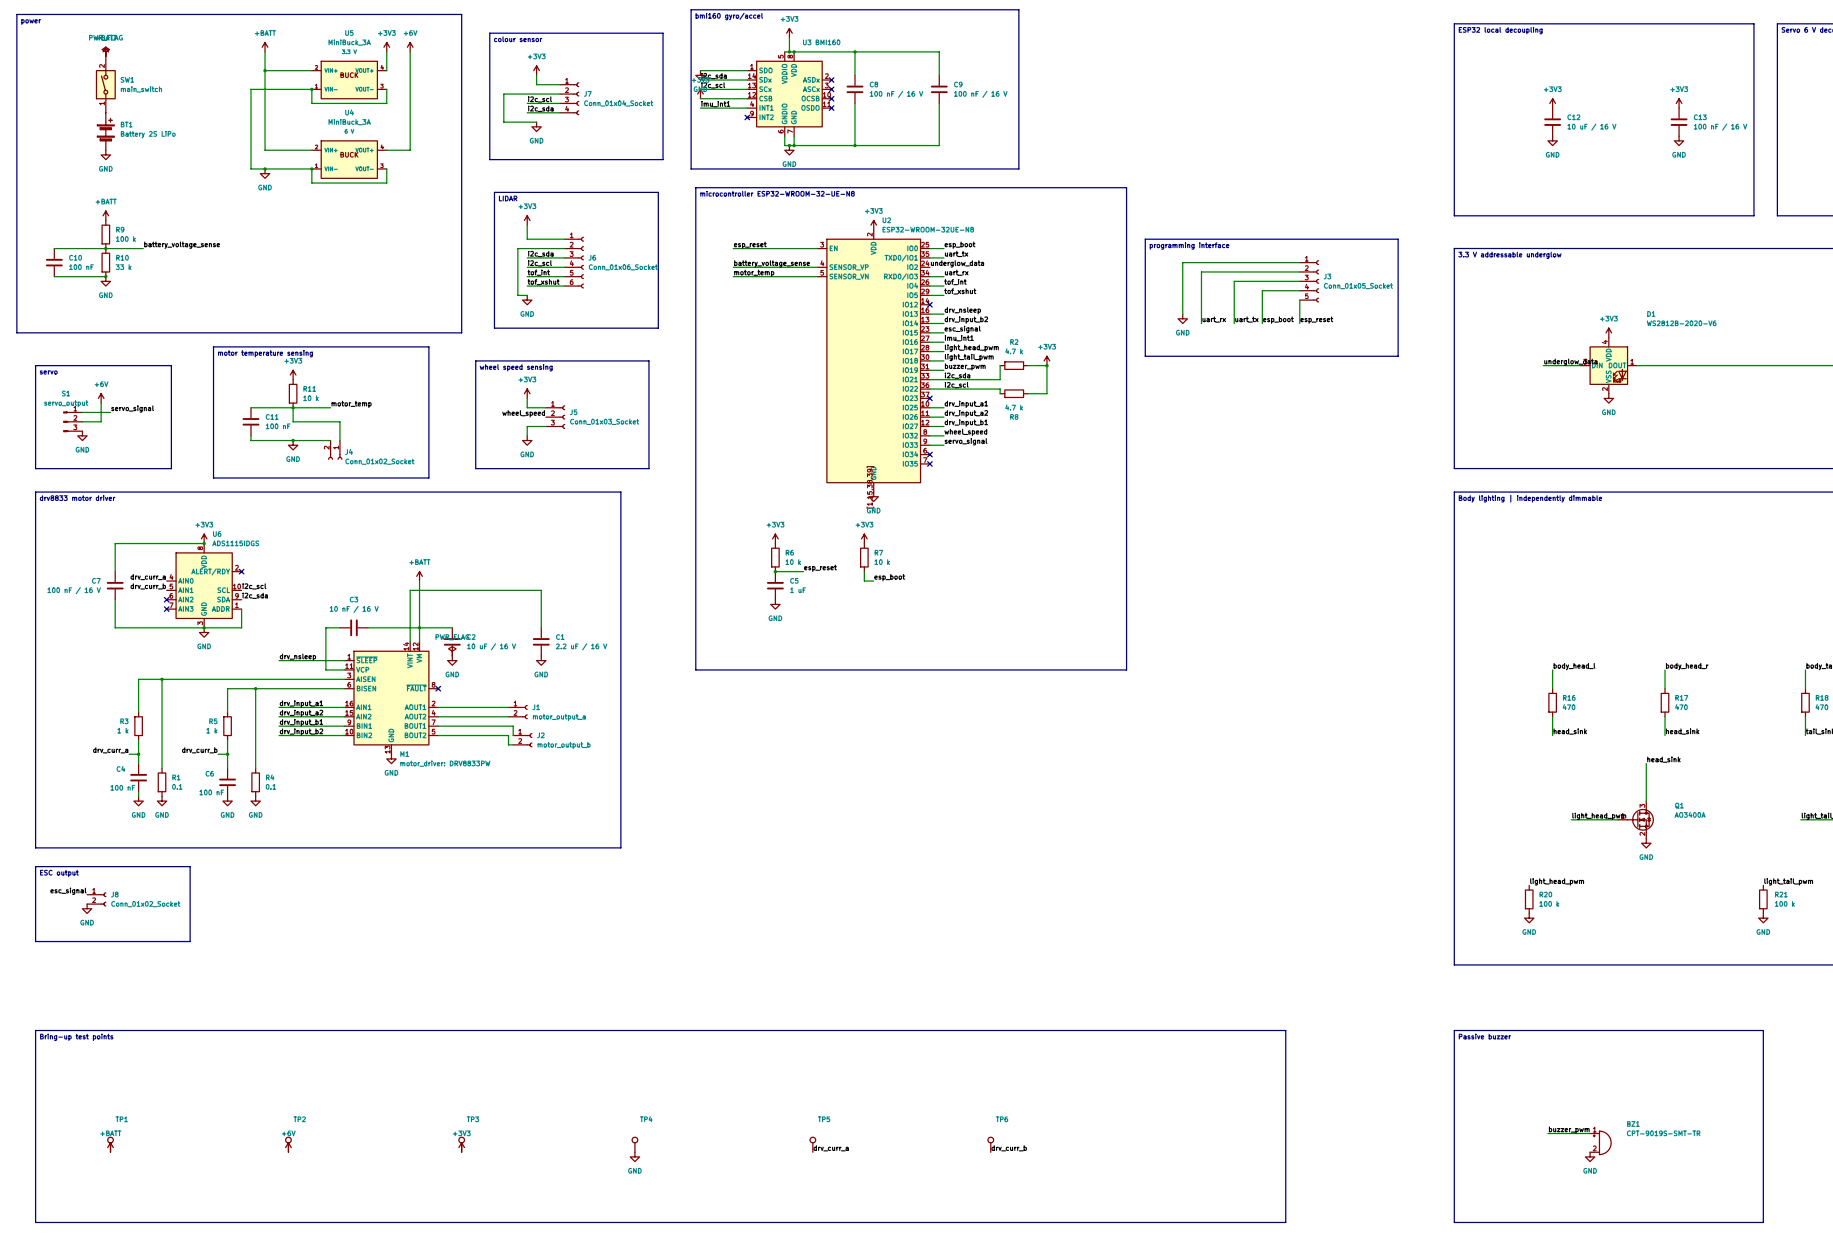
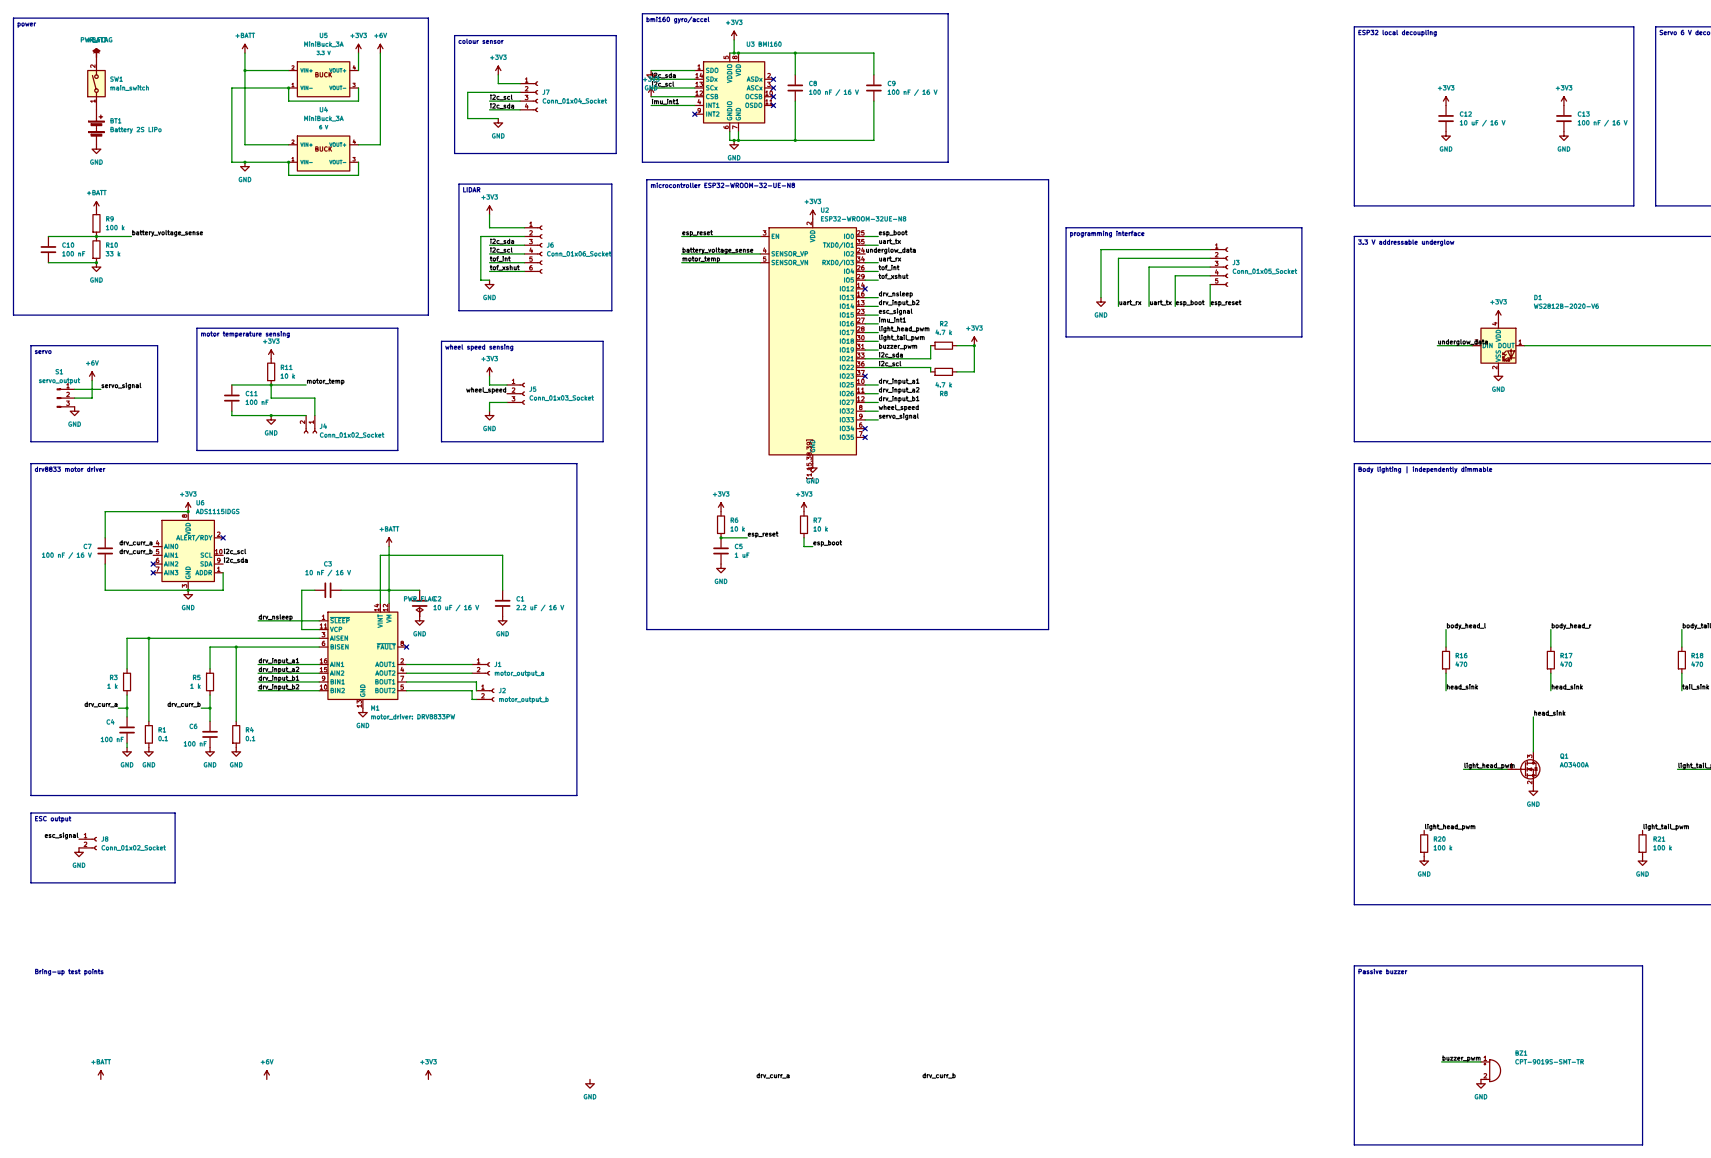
line: (35, 1030) (1285, 1030) (1285, 1222) (35, 1222) (35, 1030) -> none
part: (110, 1144) -> none
part: (288, 1144) -> none
part: (461, 1144) -> none
part: (634, 1144) -> none
part: (812, 1144) -> none
part: (990, 1144) -> none

